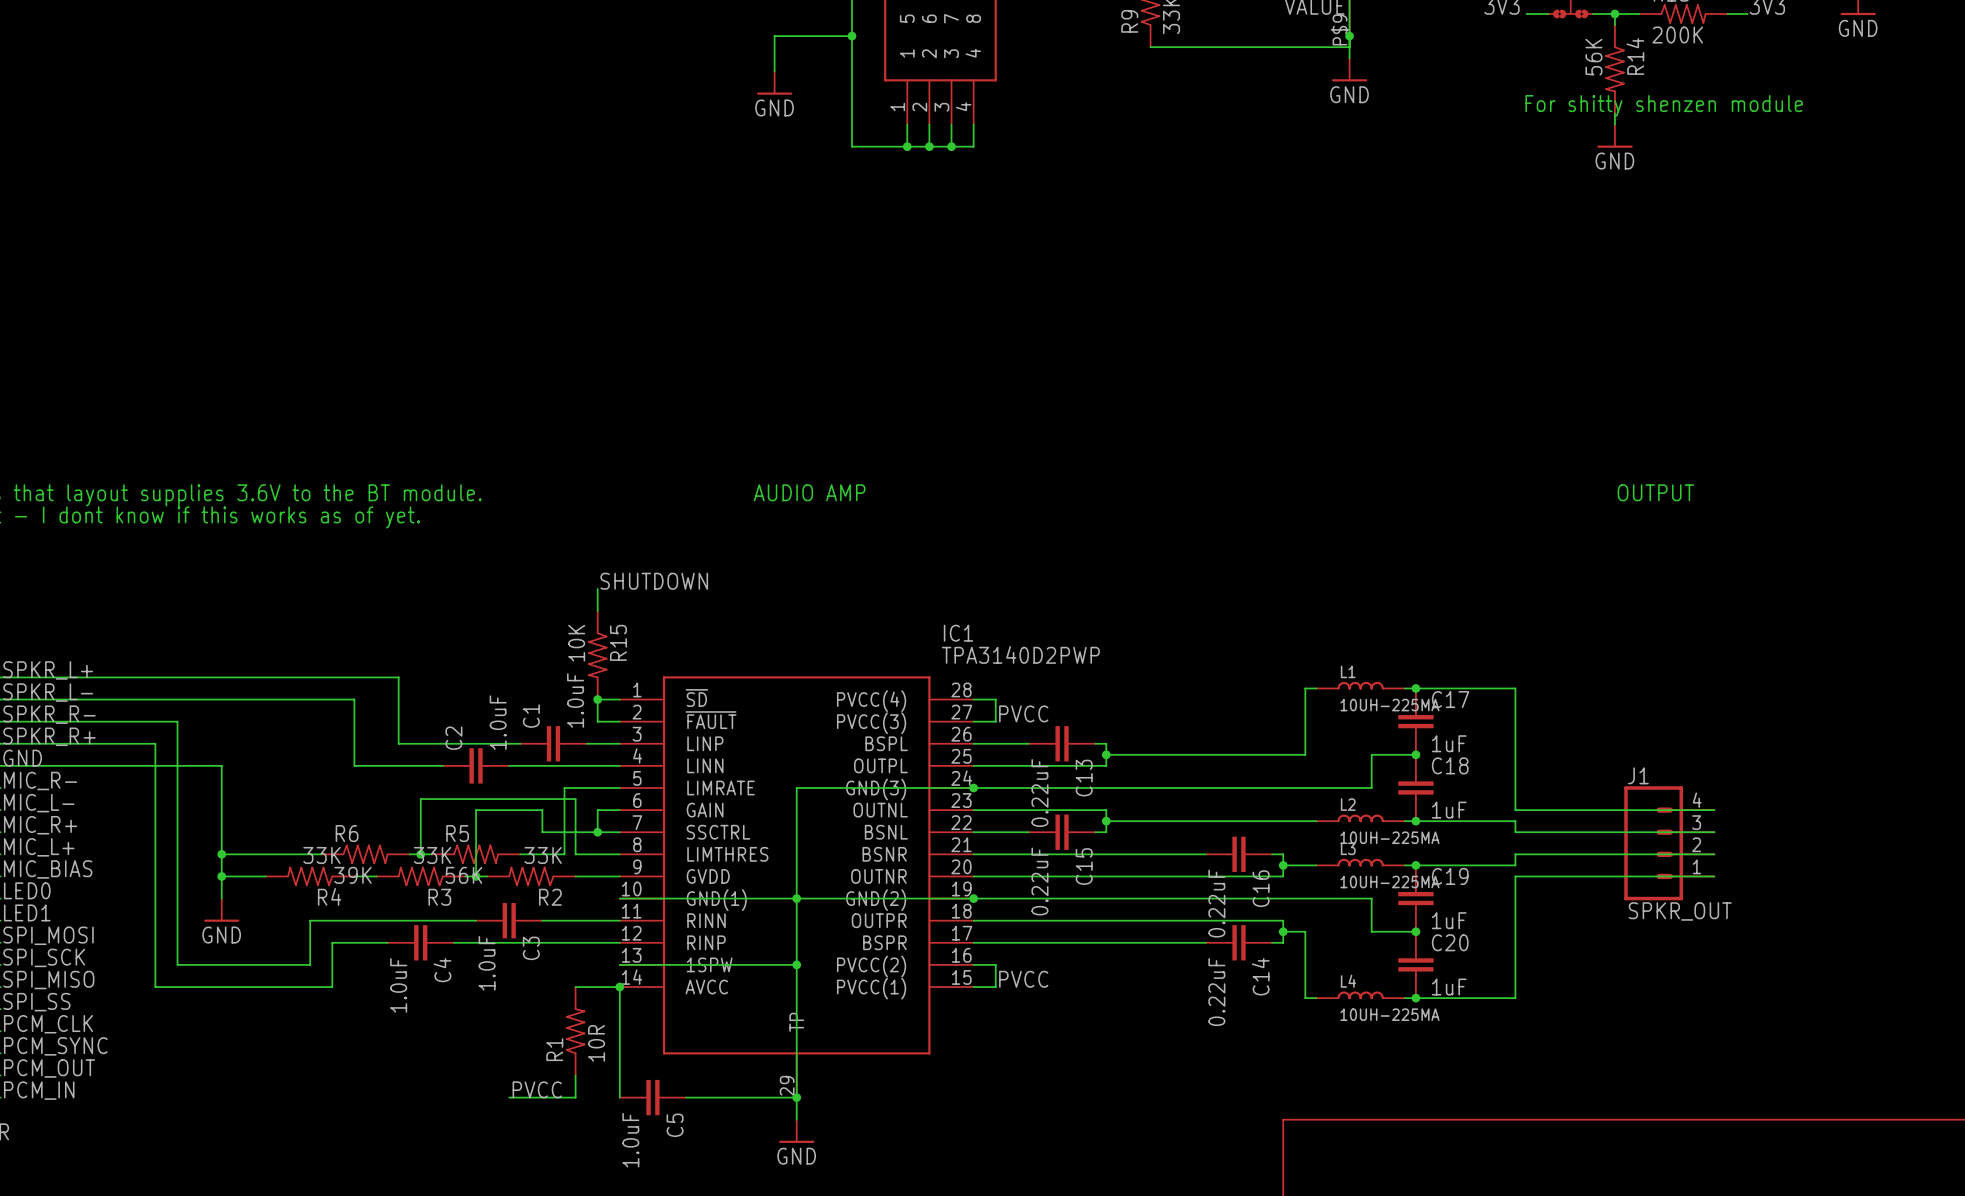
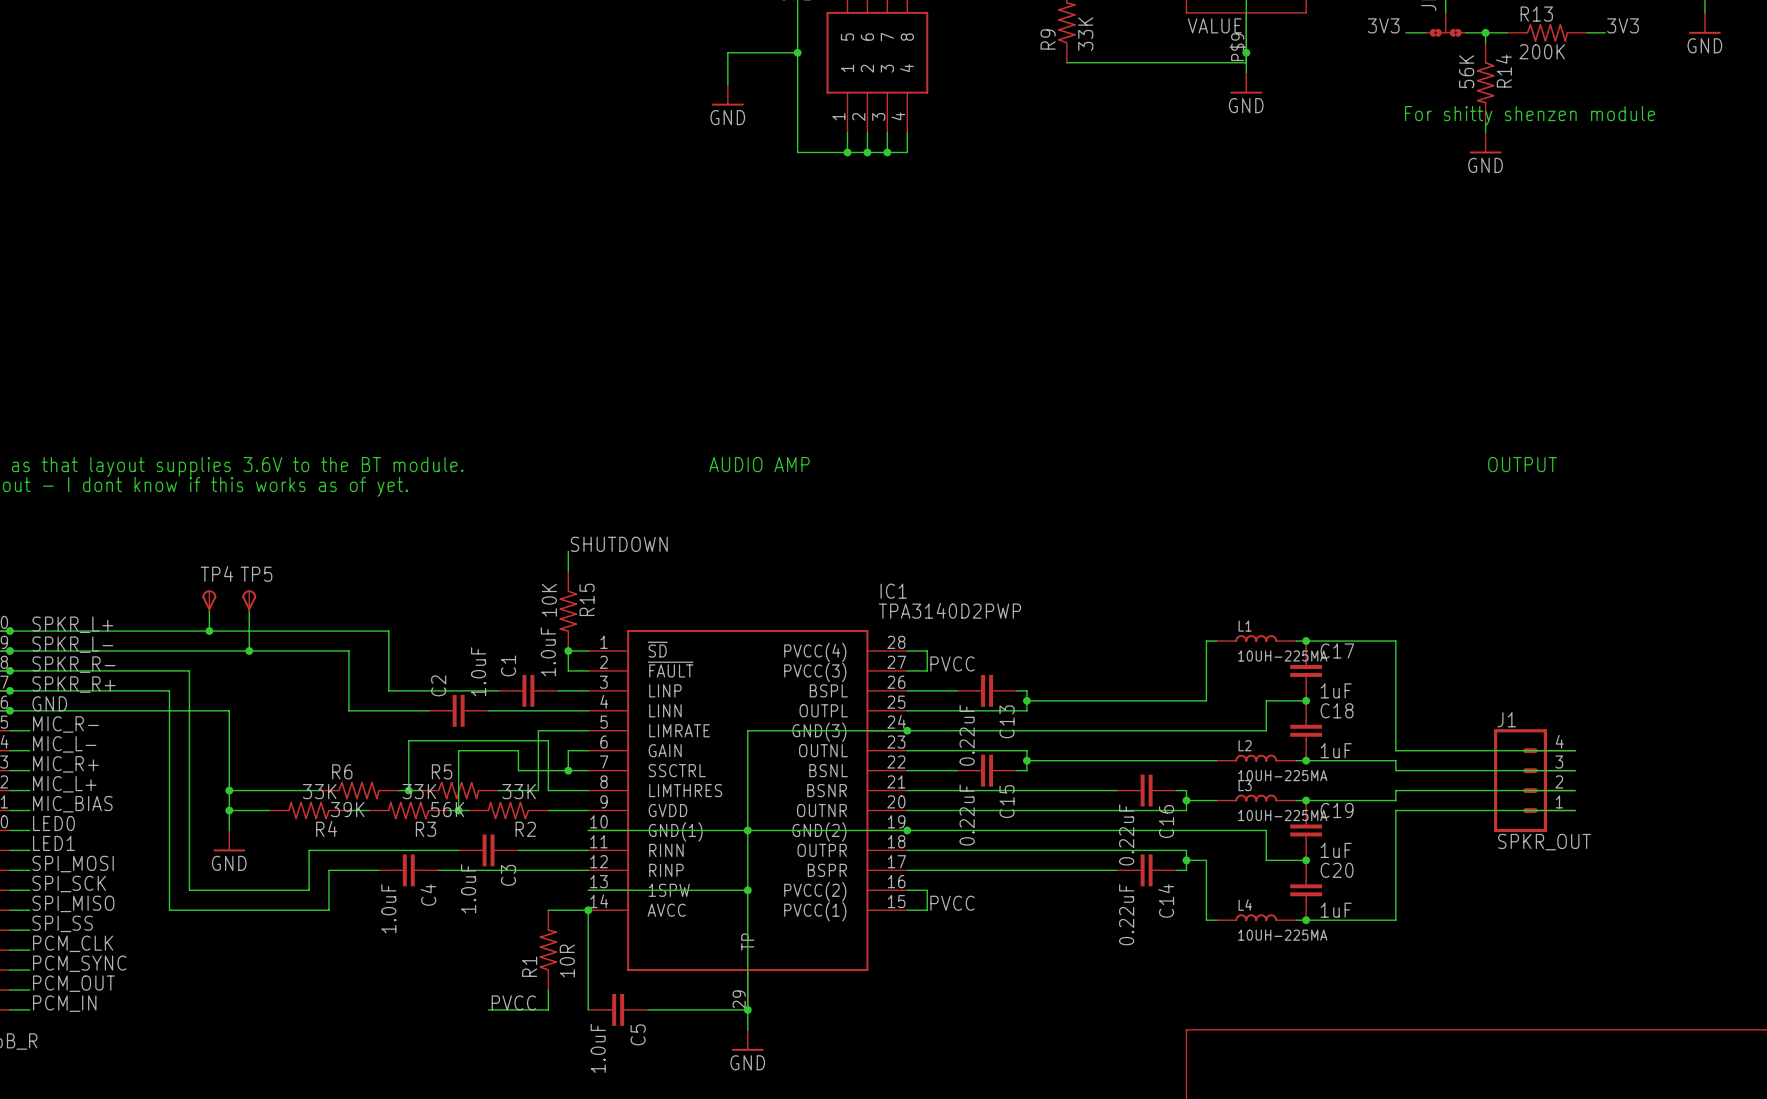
TP4: none -> (209, 600)
TP5: none -> (249, 600)
wire: none -> (209, 611) (209, 631)
wire: none -> (249, 611) (249, 651)
junction: none -> (209, 631)
junction: none -> (249, 651)

